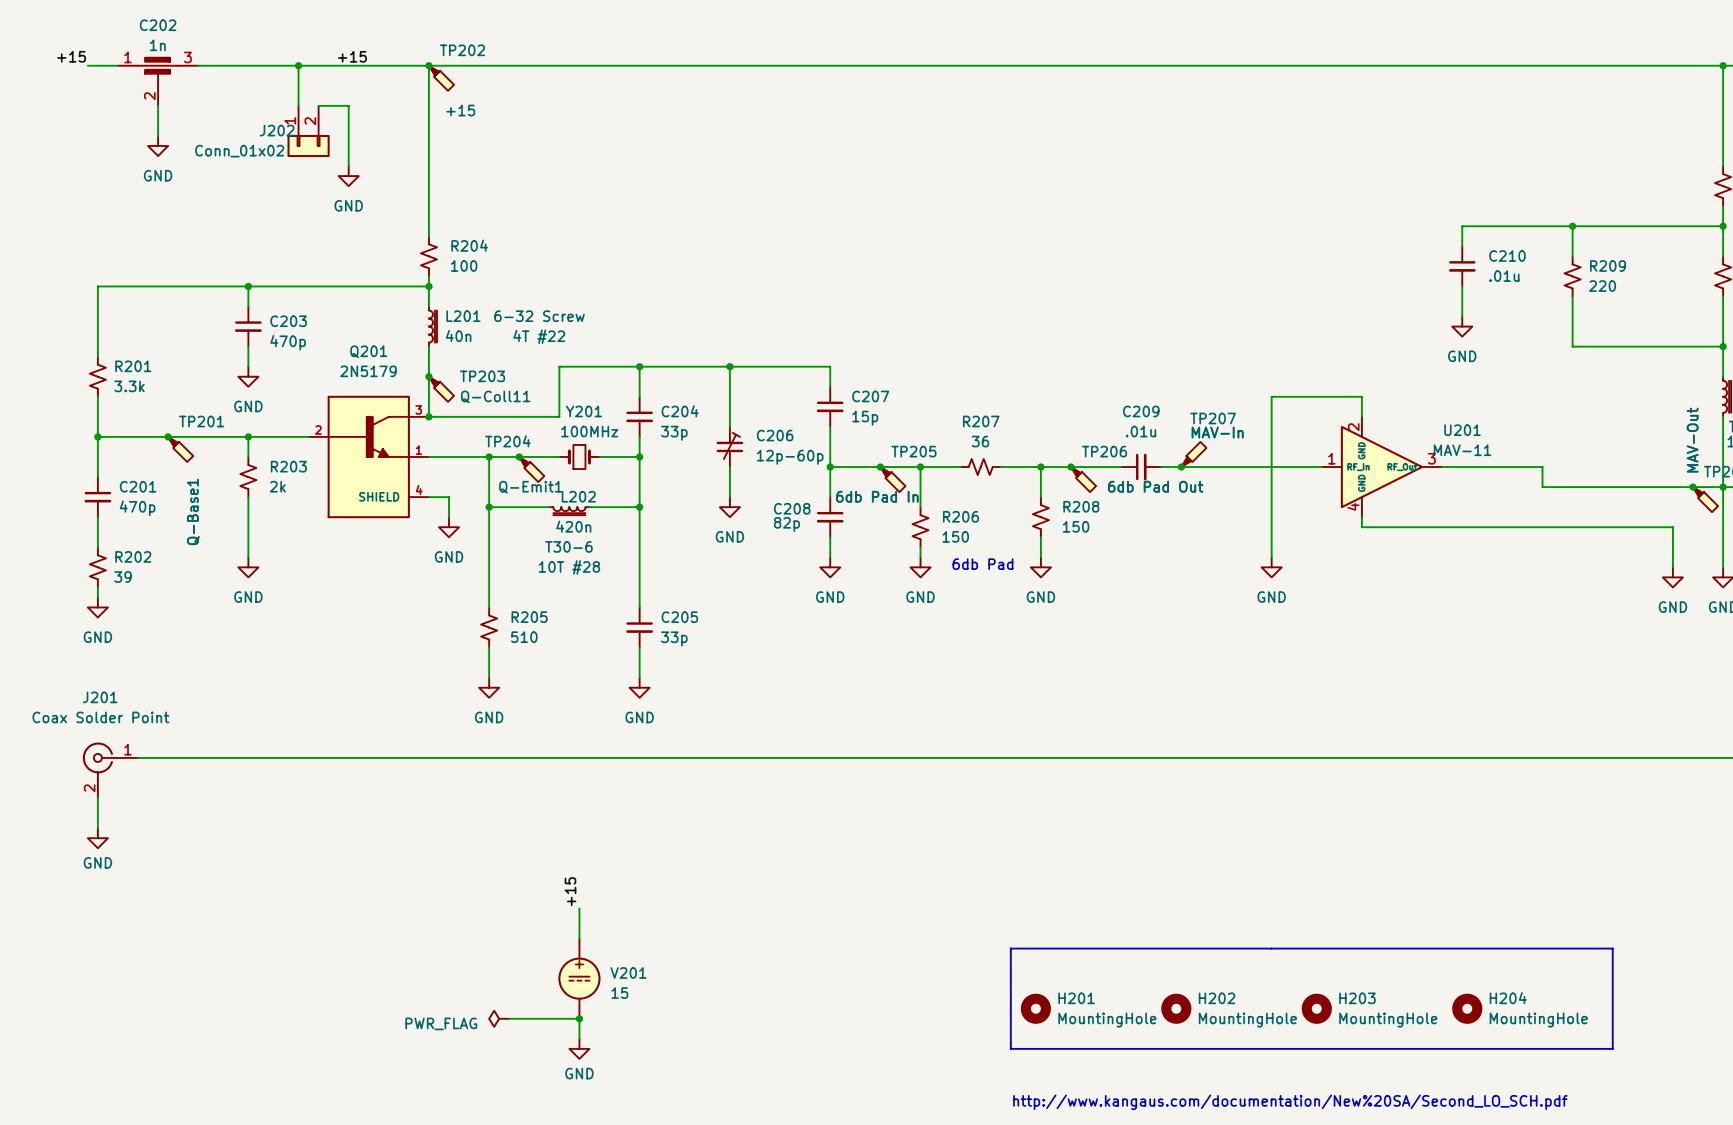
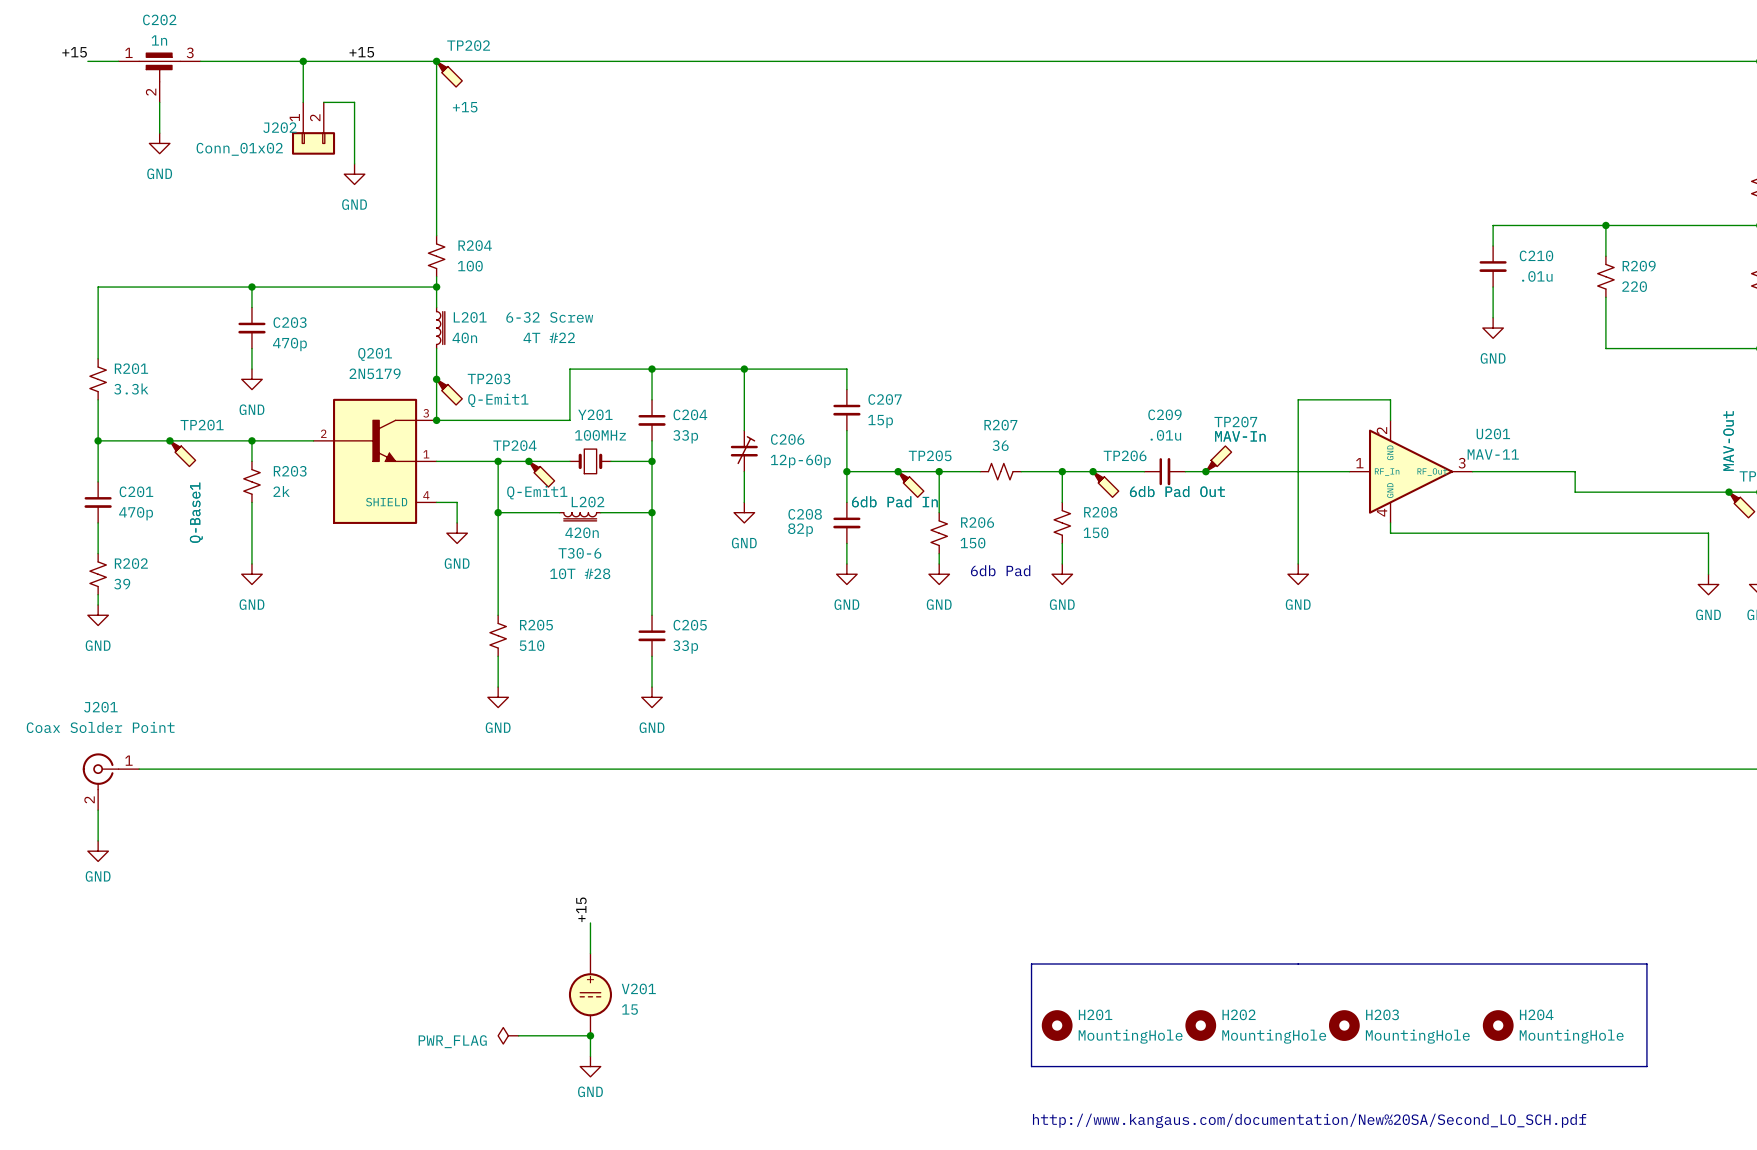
TP203 text: Q-Coll11 (495, 396) -> Q-Emit1 (498, 400)

